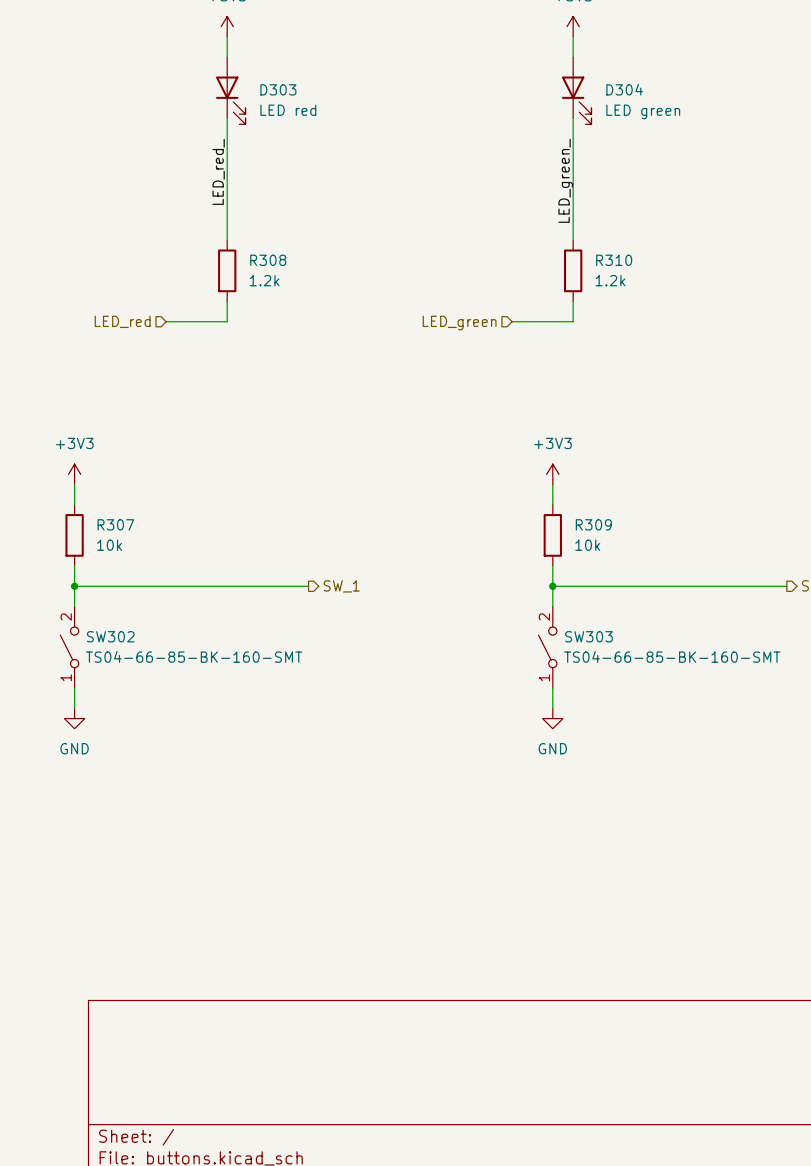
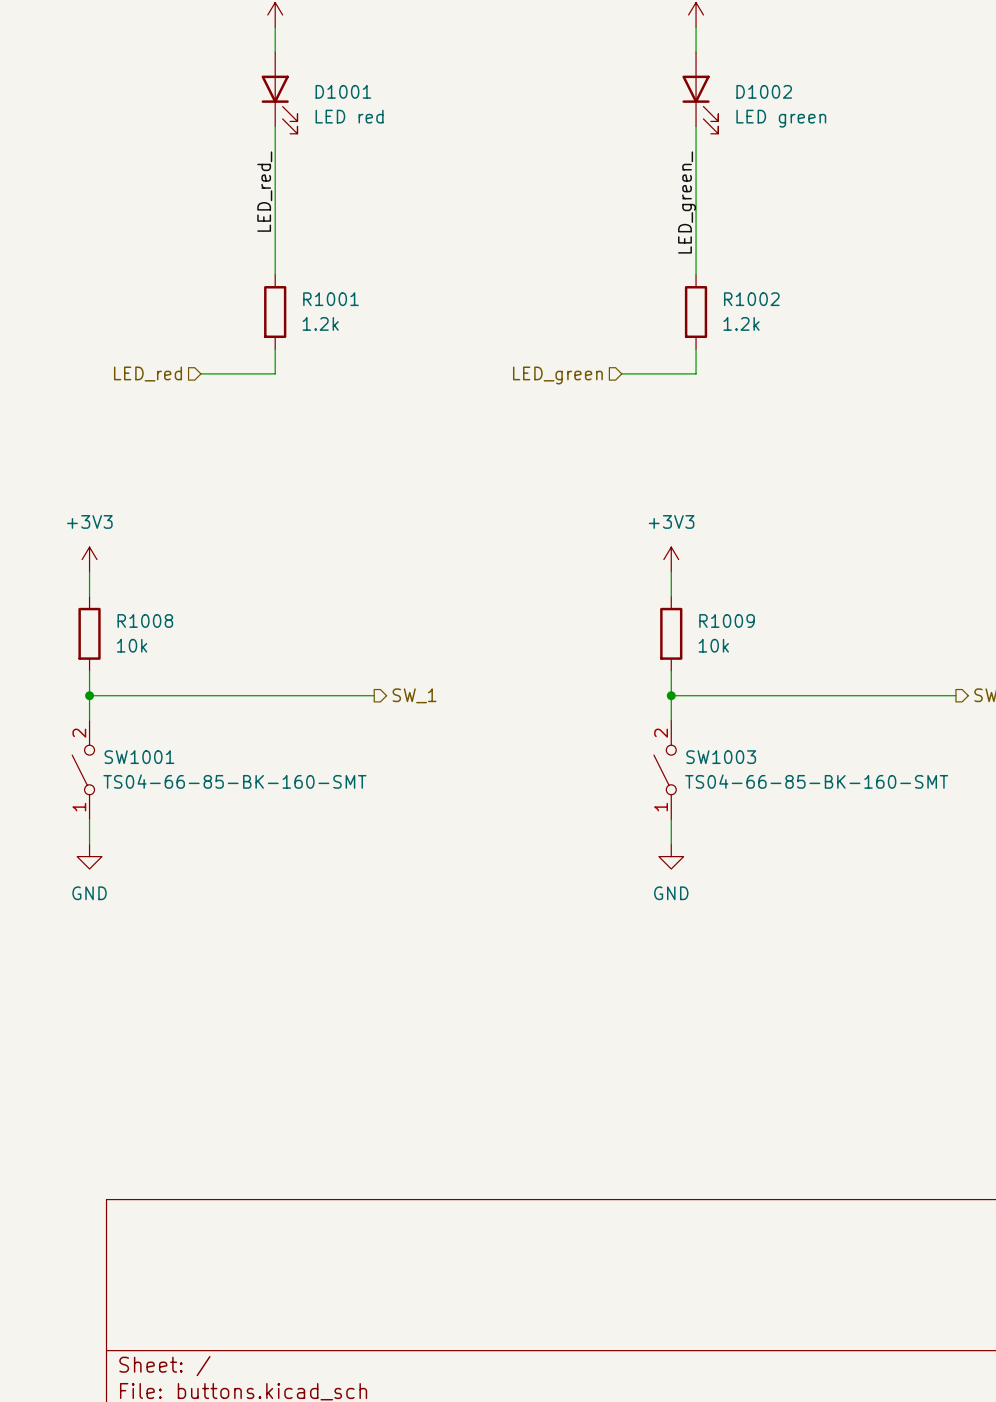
D303 name: D303 (278, 89) -> D1001 (343, 91)
D304 name: D304 (624, 89) -> D1002 (764, 91)
R308 name: R308 (268, 260) -> R1001 (330, 299)
R310 name: R310 (614, 260) -> R1002 (751, 299)
R307 name: R307 (115, 524) -> R1008 (145, 620)
R309 name: R309 (593, 524) -> R1009 (727, 620)
SW302 name: SW302 (110, 636) -> SW1001 (139, 757)
SW303 name: SW303 (588, 636) -> SW1003 (721, 757)

